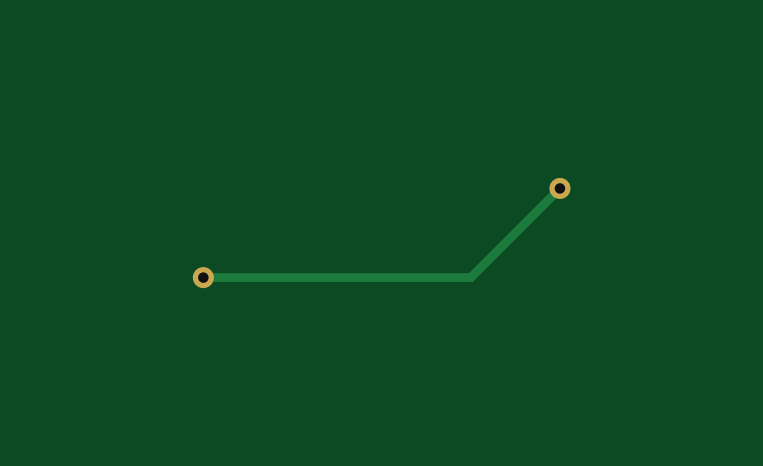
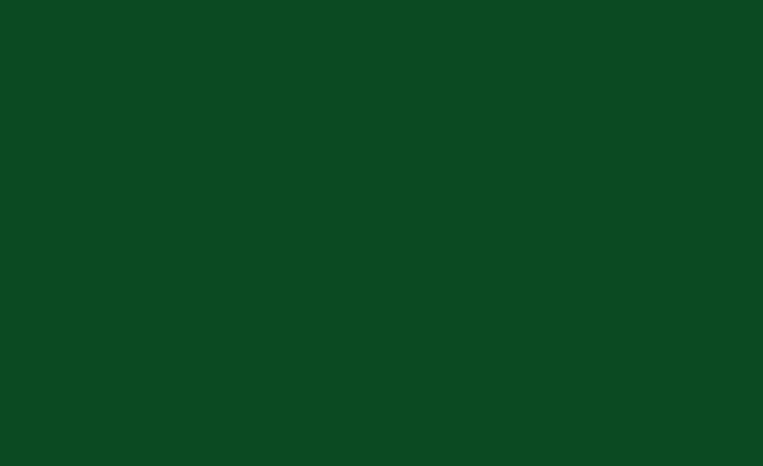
track: (559, 188) (470, 277) (203, 277) -> none
via: (559, 188) -> none
via: (203, 277) -> none

